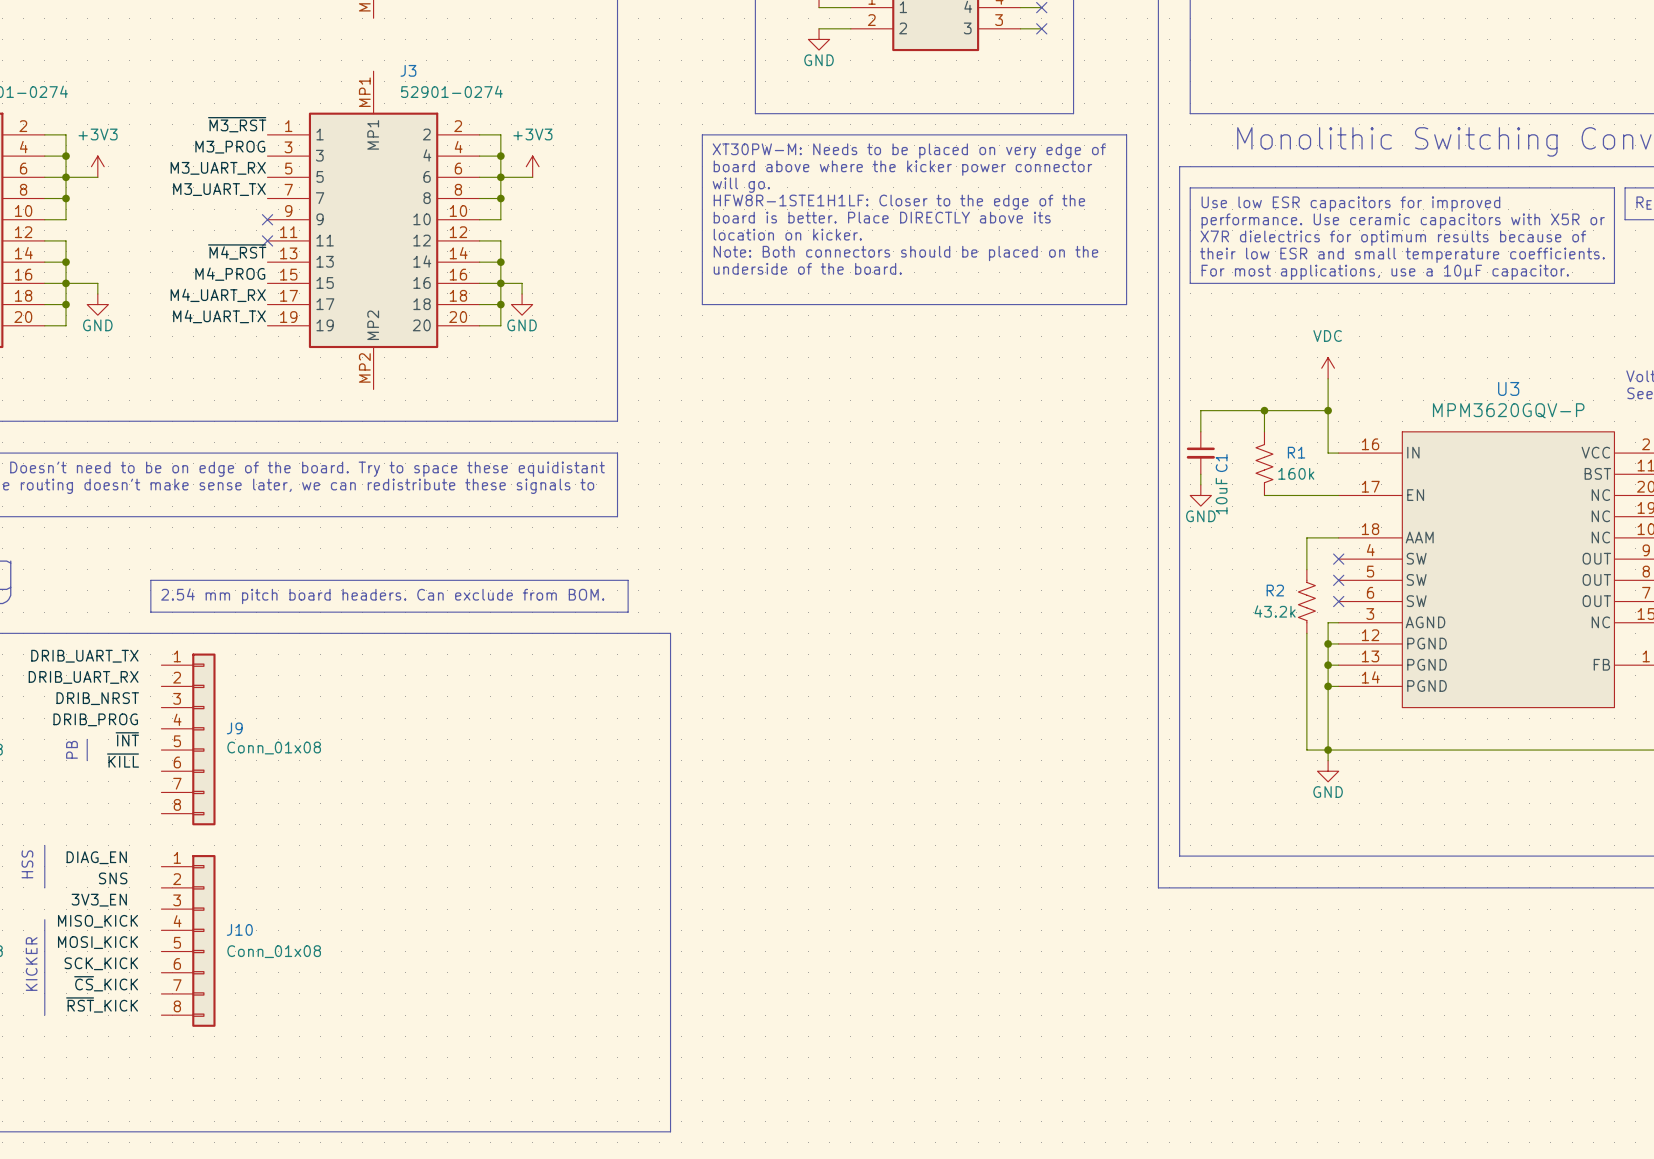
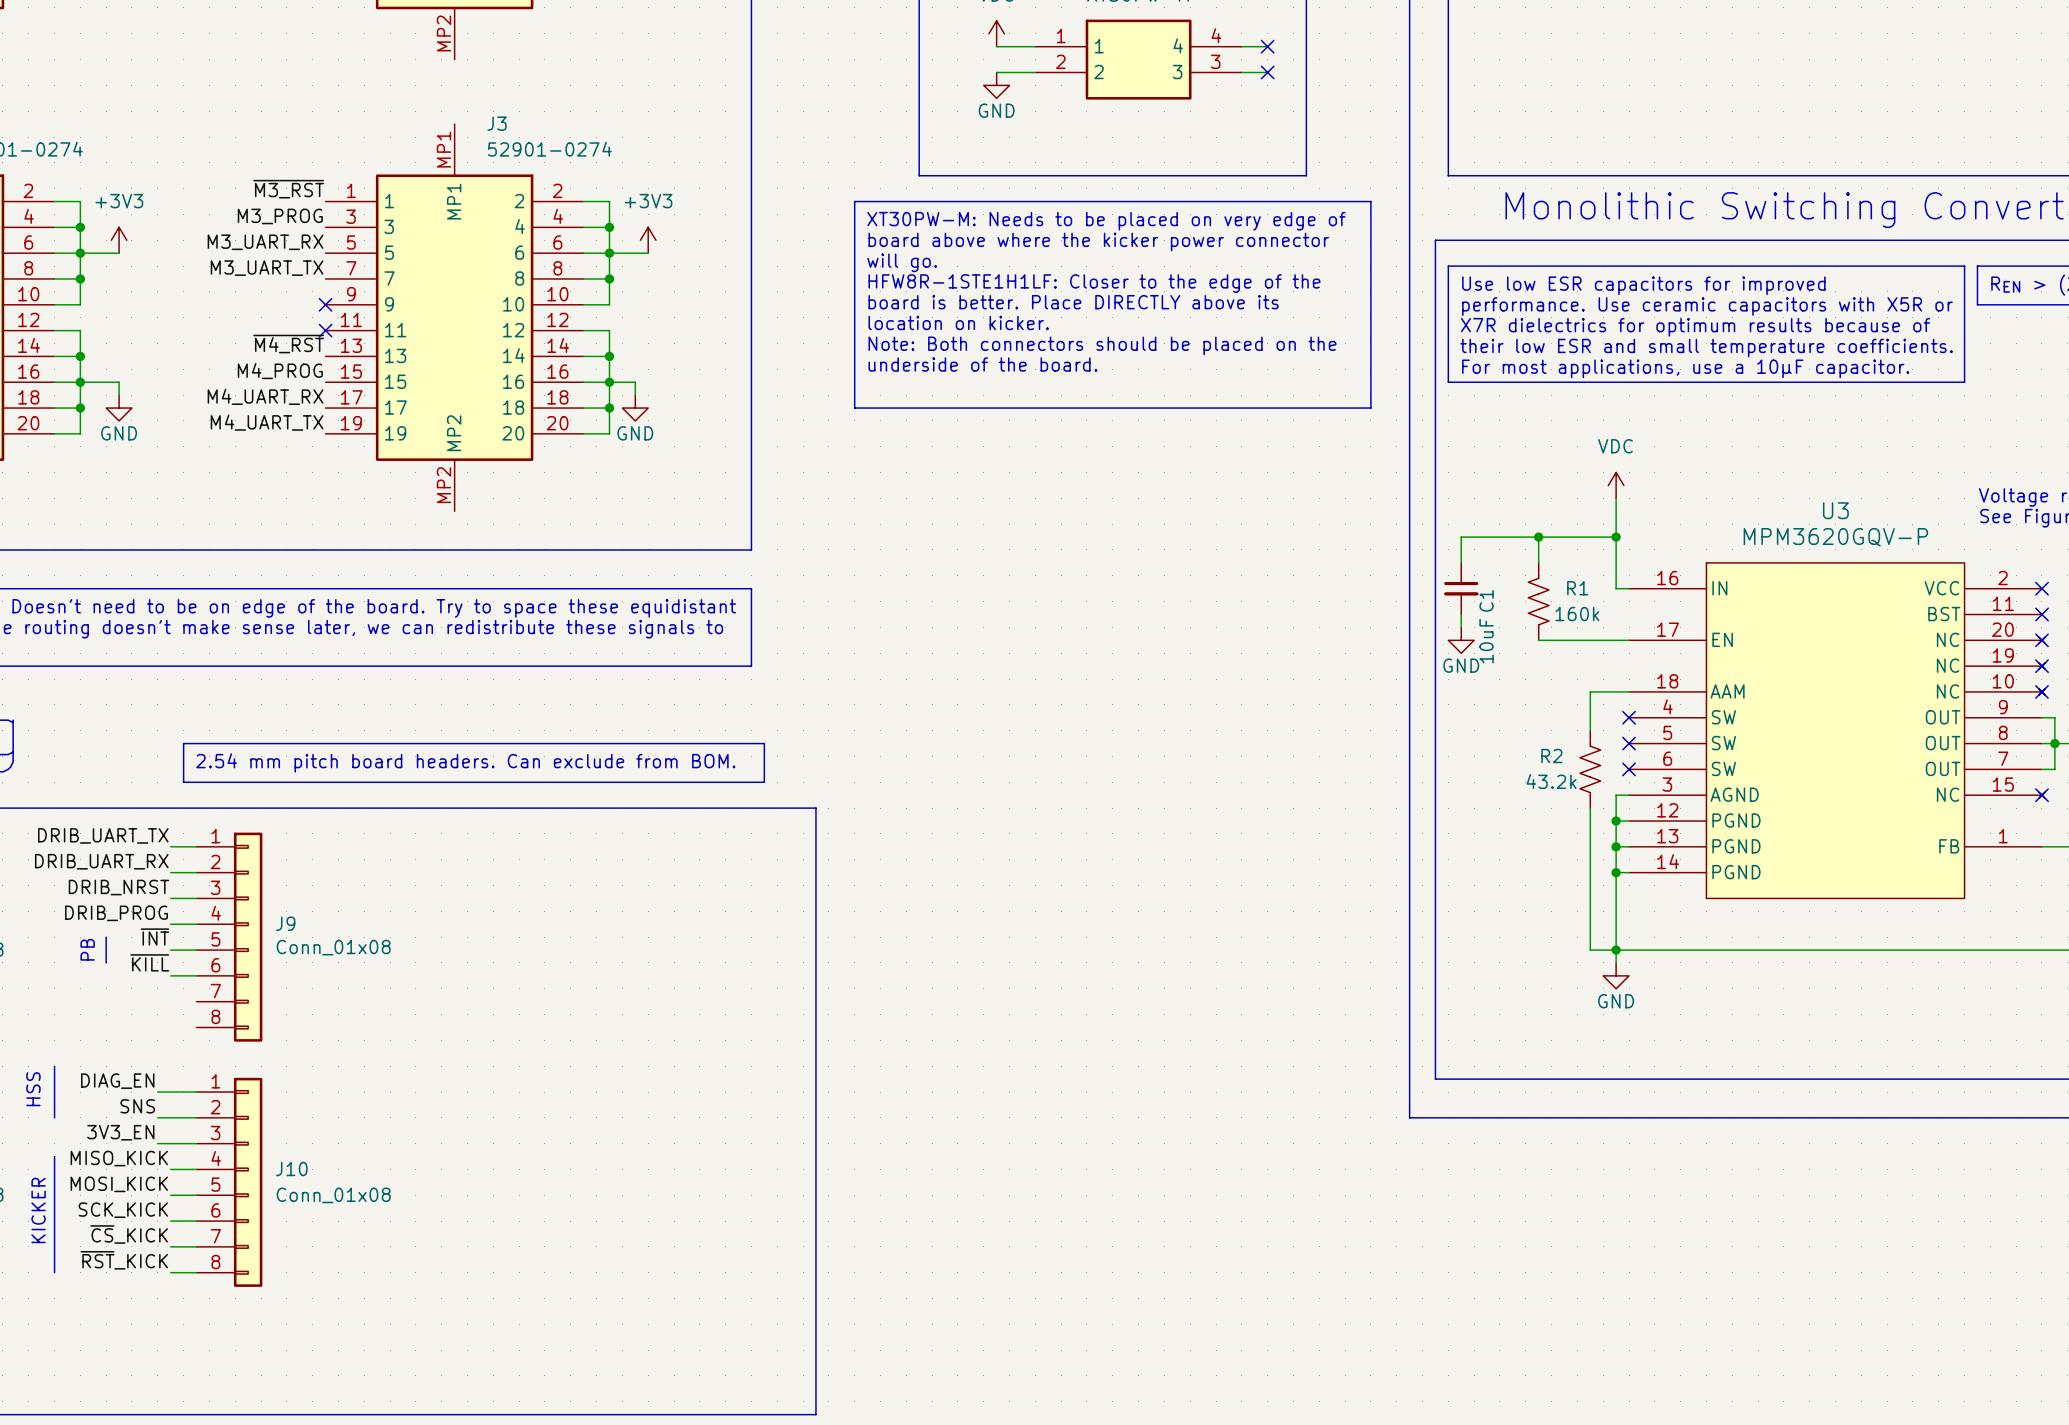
wire: none -> (170, 846) (196, 846)
wire: none -> (170, 872) (196, 872)
wire: none -> (170, 898) (196, 898)
wire: none -> (170, 924) (196, 924)
wire: none -> (170, 950) (196, 950)
wire: none -> (170, 975) (196, 975)
wire: none -> (157, 1092) (196, 1092)
wire: none -> (157, 1117) (196, 1117)
wire: none -> (157, 1143) (196, 1143)
wire: none -> (170, 1169) (196, 1169)
wire: none -> (170, 1195) (196, 1195)
wire: none -> (170, 1221) (196, 1221)
wire: none -> (170, 1246) (196, 1246)
wire: none -> (170, 1272) (196, 1272)

